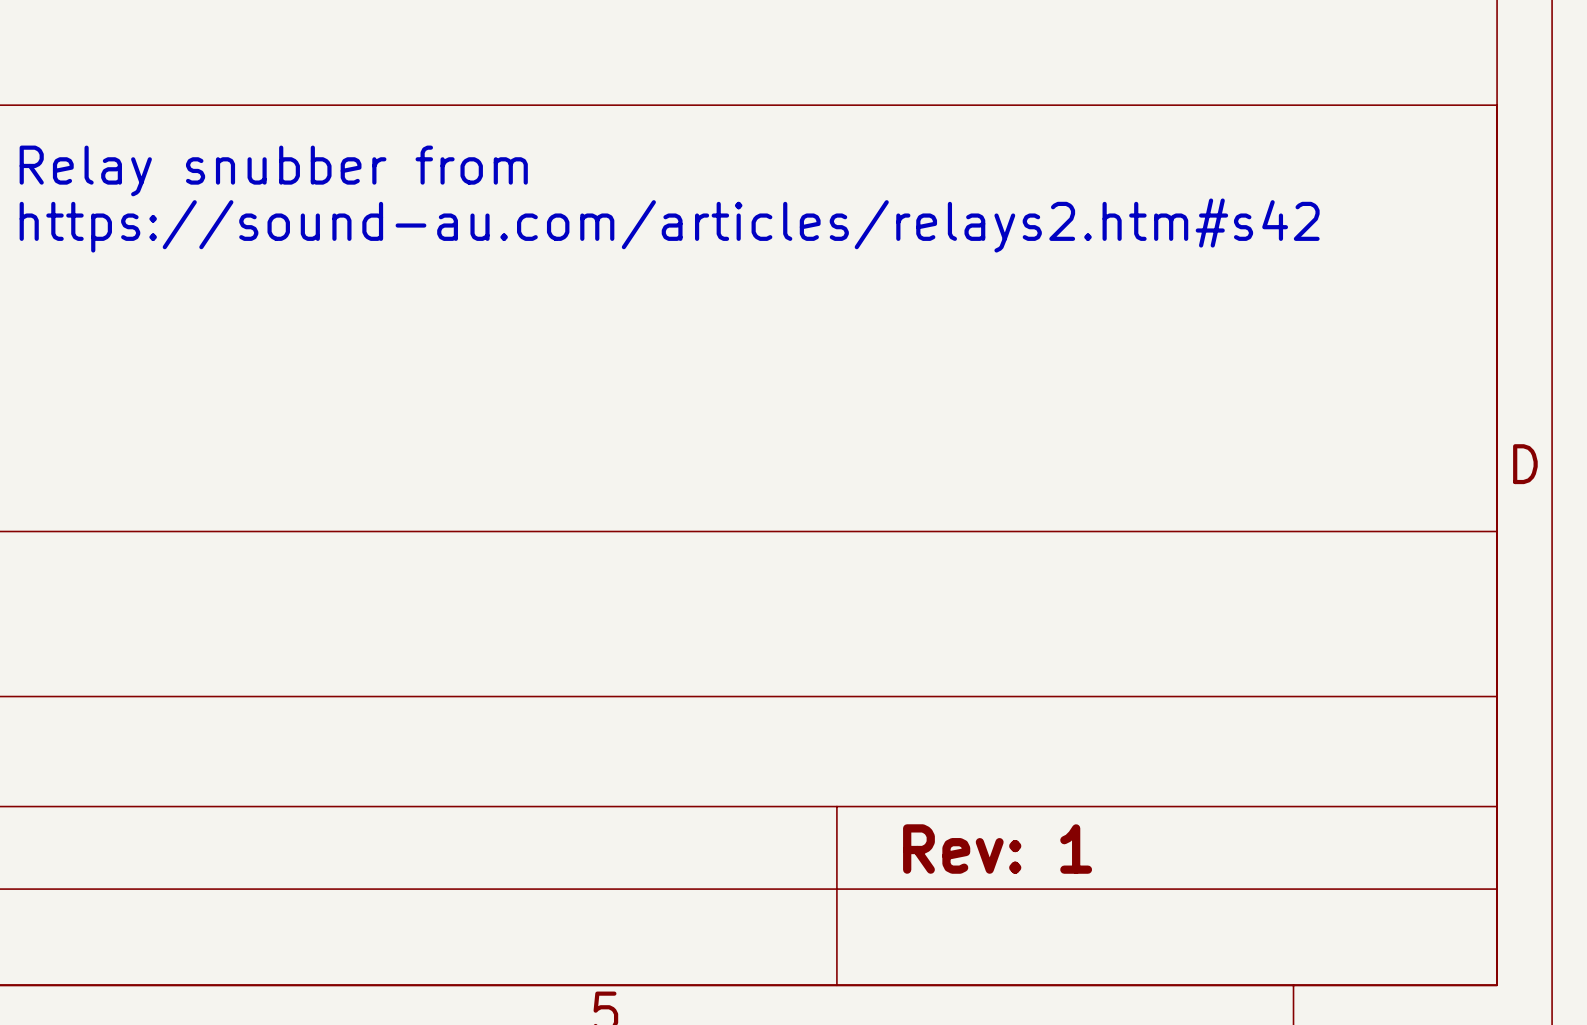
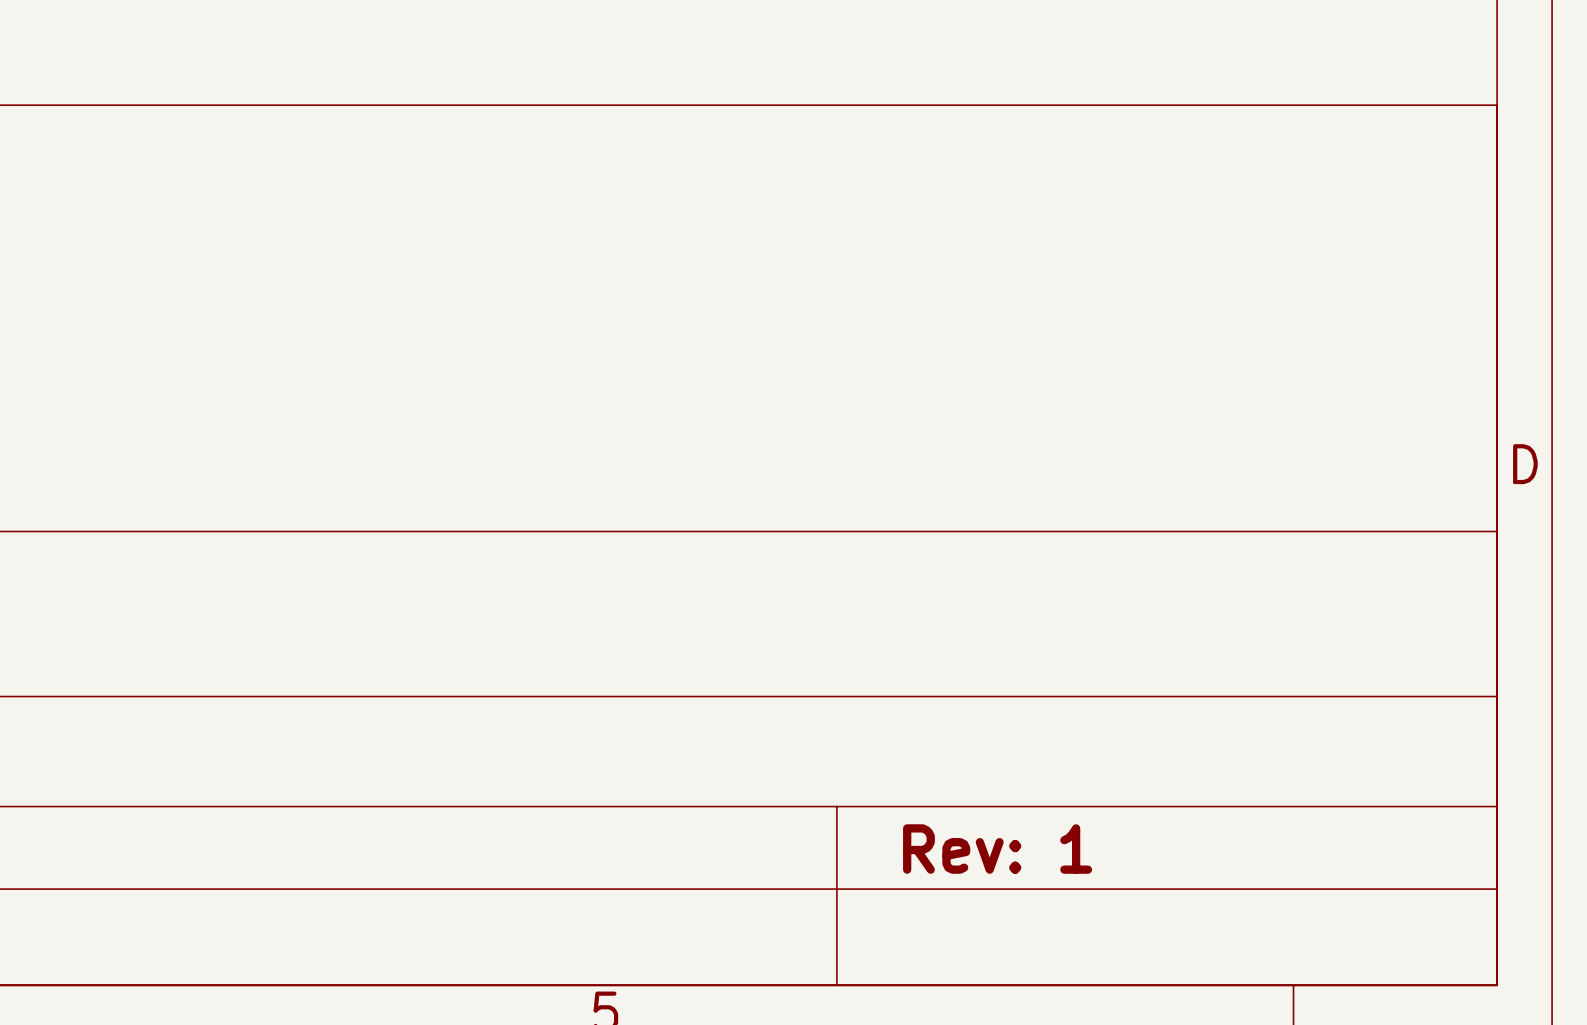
text: Relay snubber from (273, 170) -> none
text: https://sound-au.com/articles/relays2.htm#s42 (669, 225) -> none

